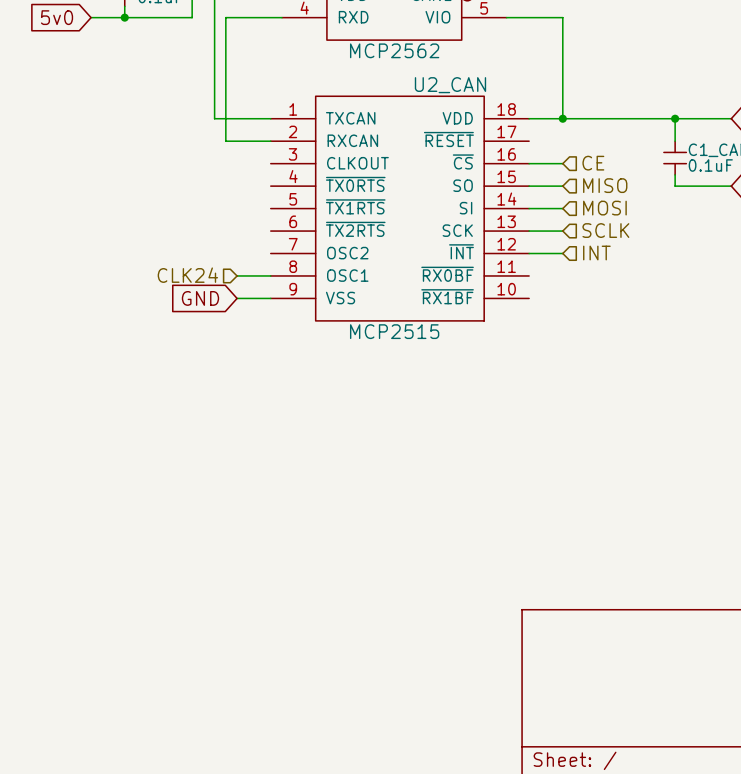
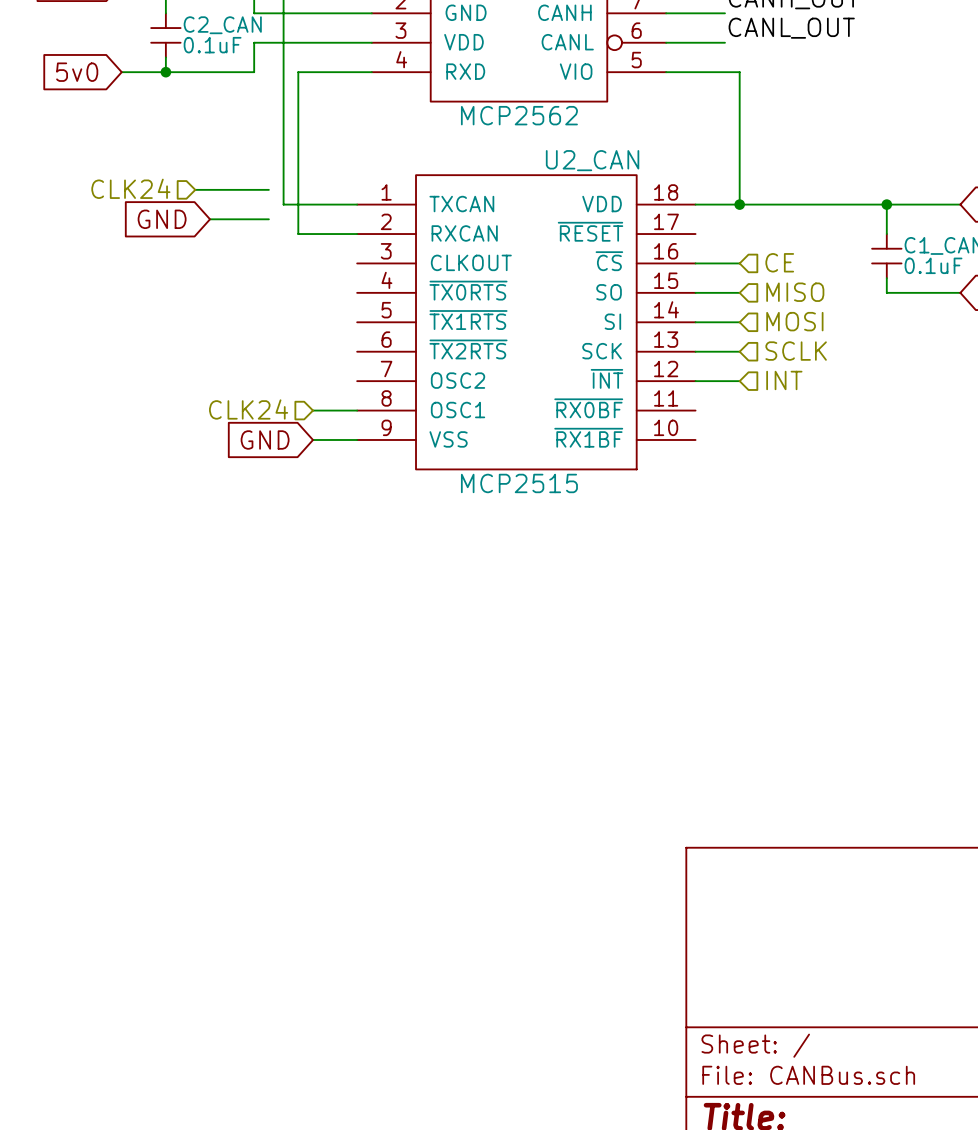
hierarchical label: none -> CLK24 (130, 188)
wire: none -> (195, 189) (268, 189)
global label: none -> GND (162, 219)
wire: none -> (210, 219) (268, 219)

